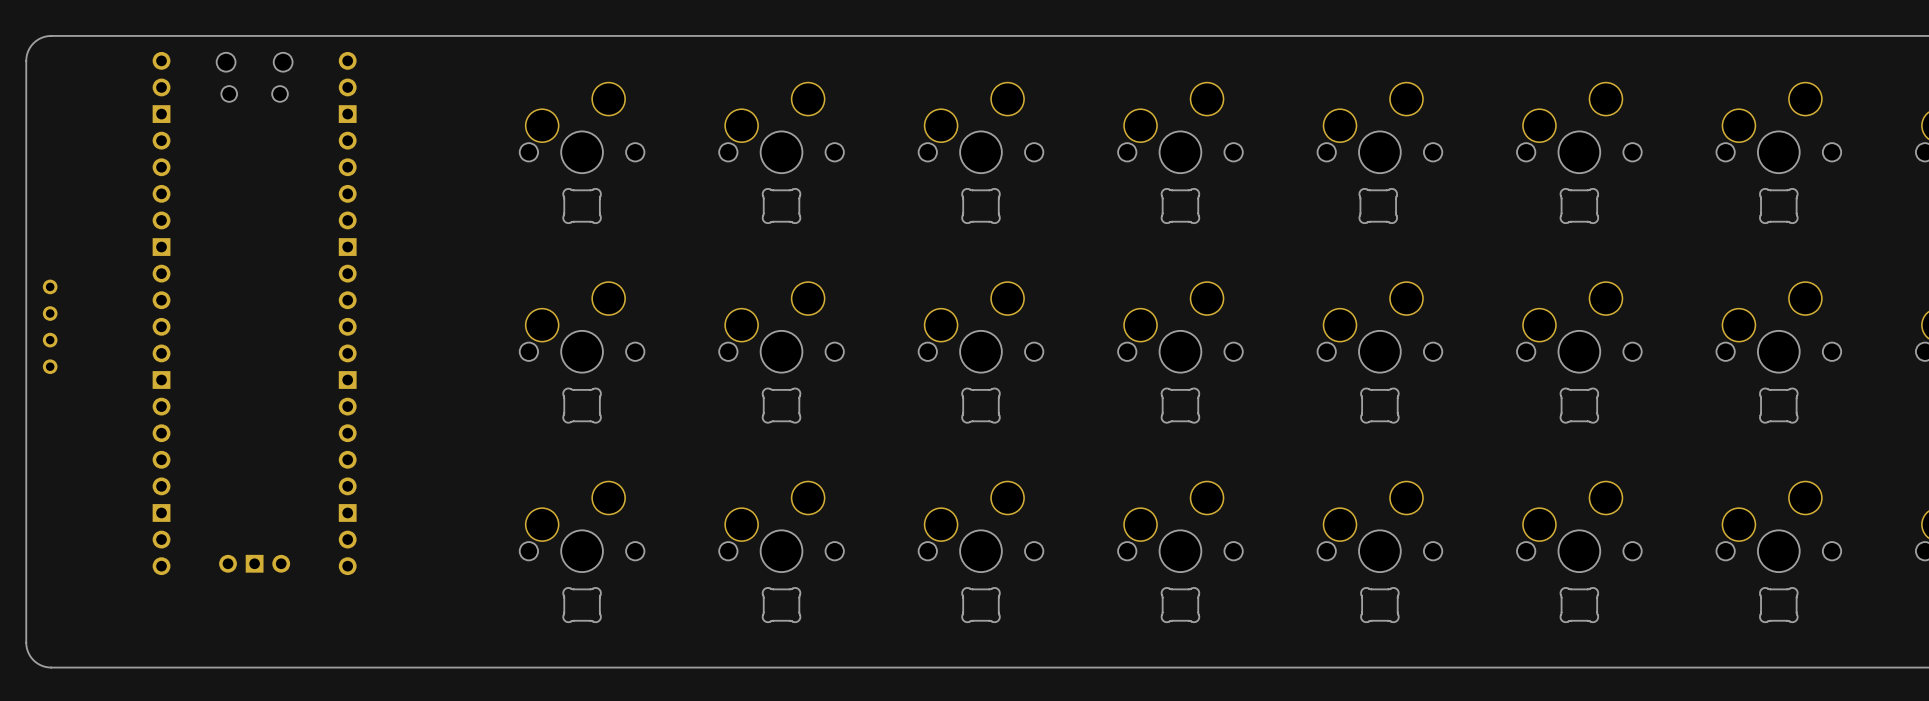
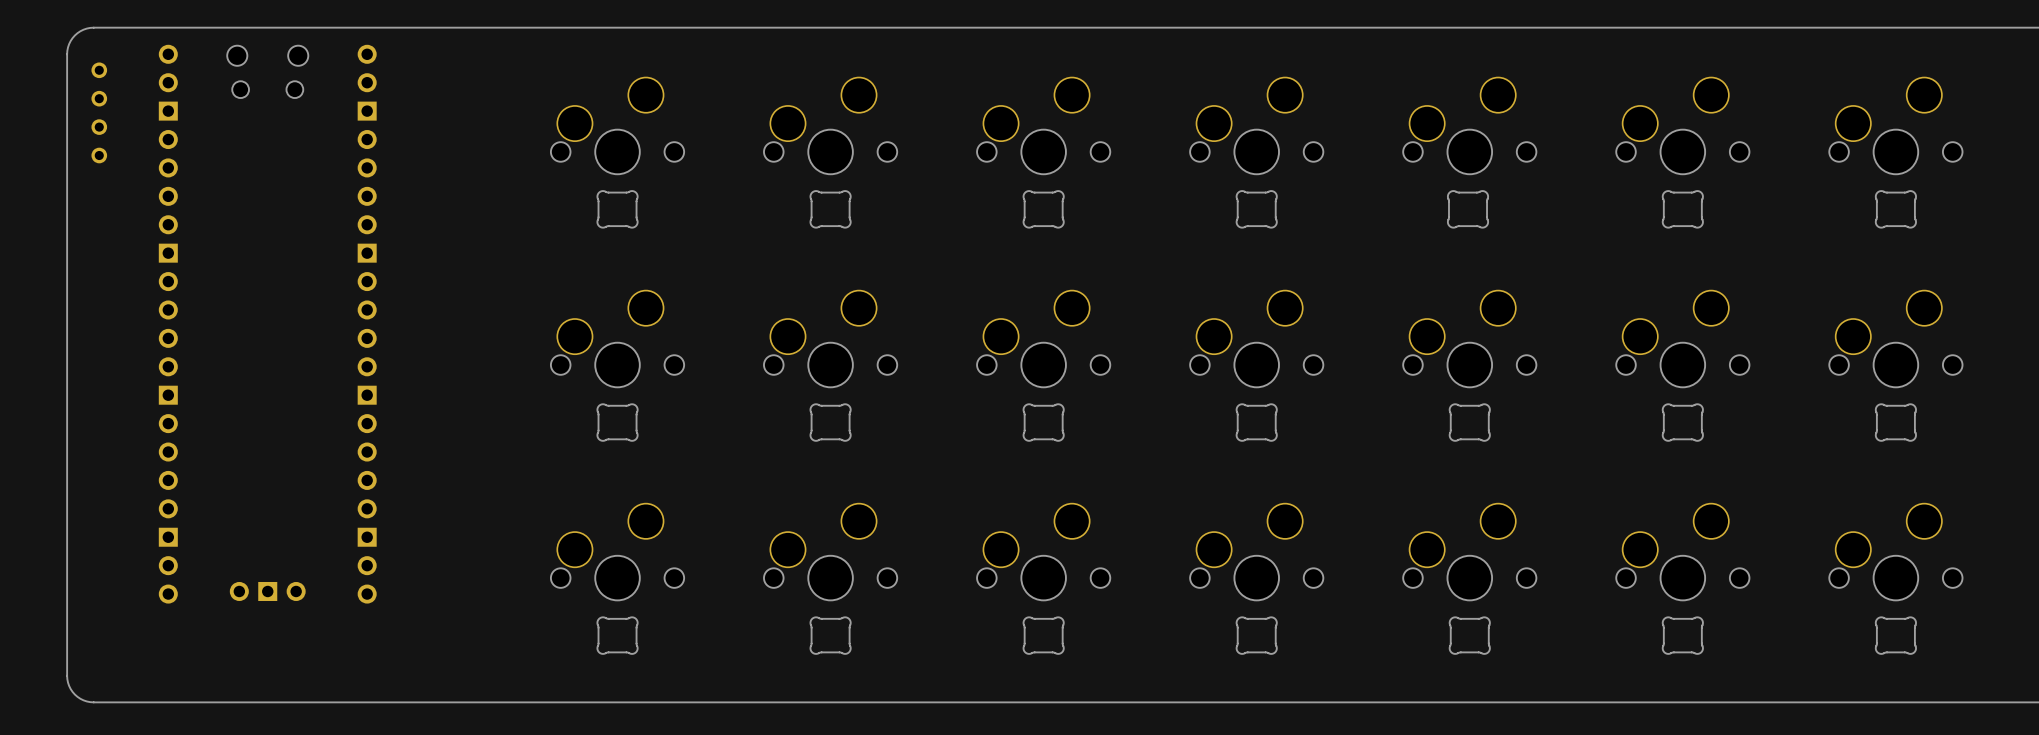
board edge: (91, 35) (51, 35) (41, 37) (31, 45) (26, 60) (26, 645) (31, 658) (42, 666) (91, 667) -> (93, 27) (83, 29) (74, 35) (69, 44) (67, 54) (67, 675) (69, 685) (74, 694) (83, 700) (93, 702)
part position: (50, 326) -> (99, 112)

